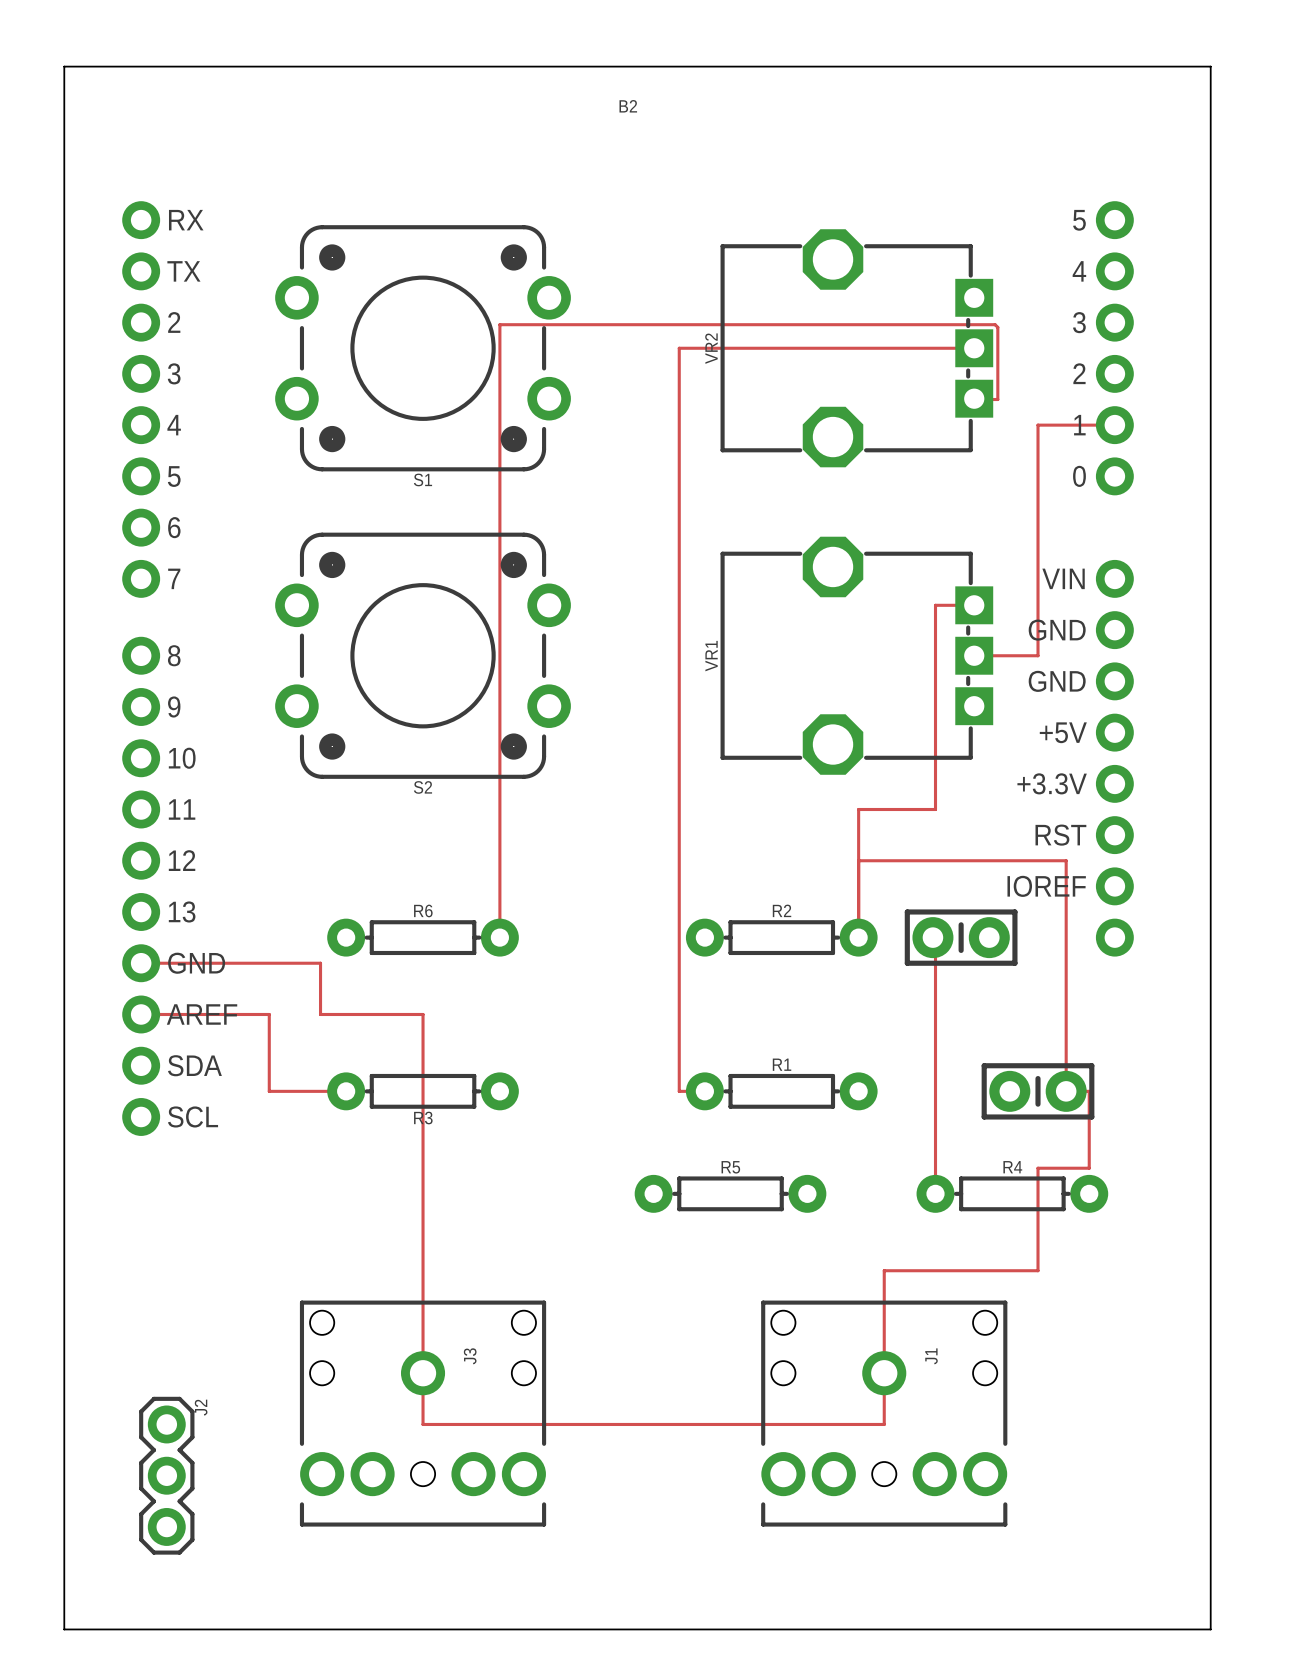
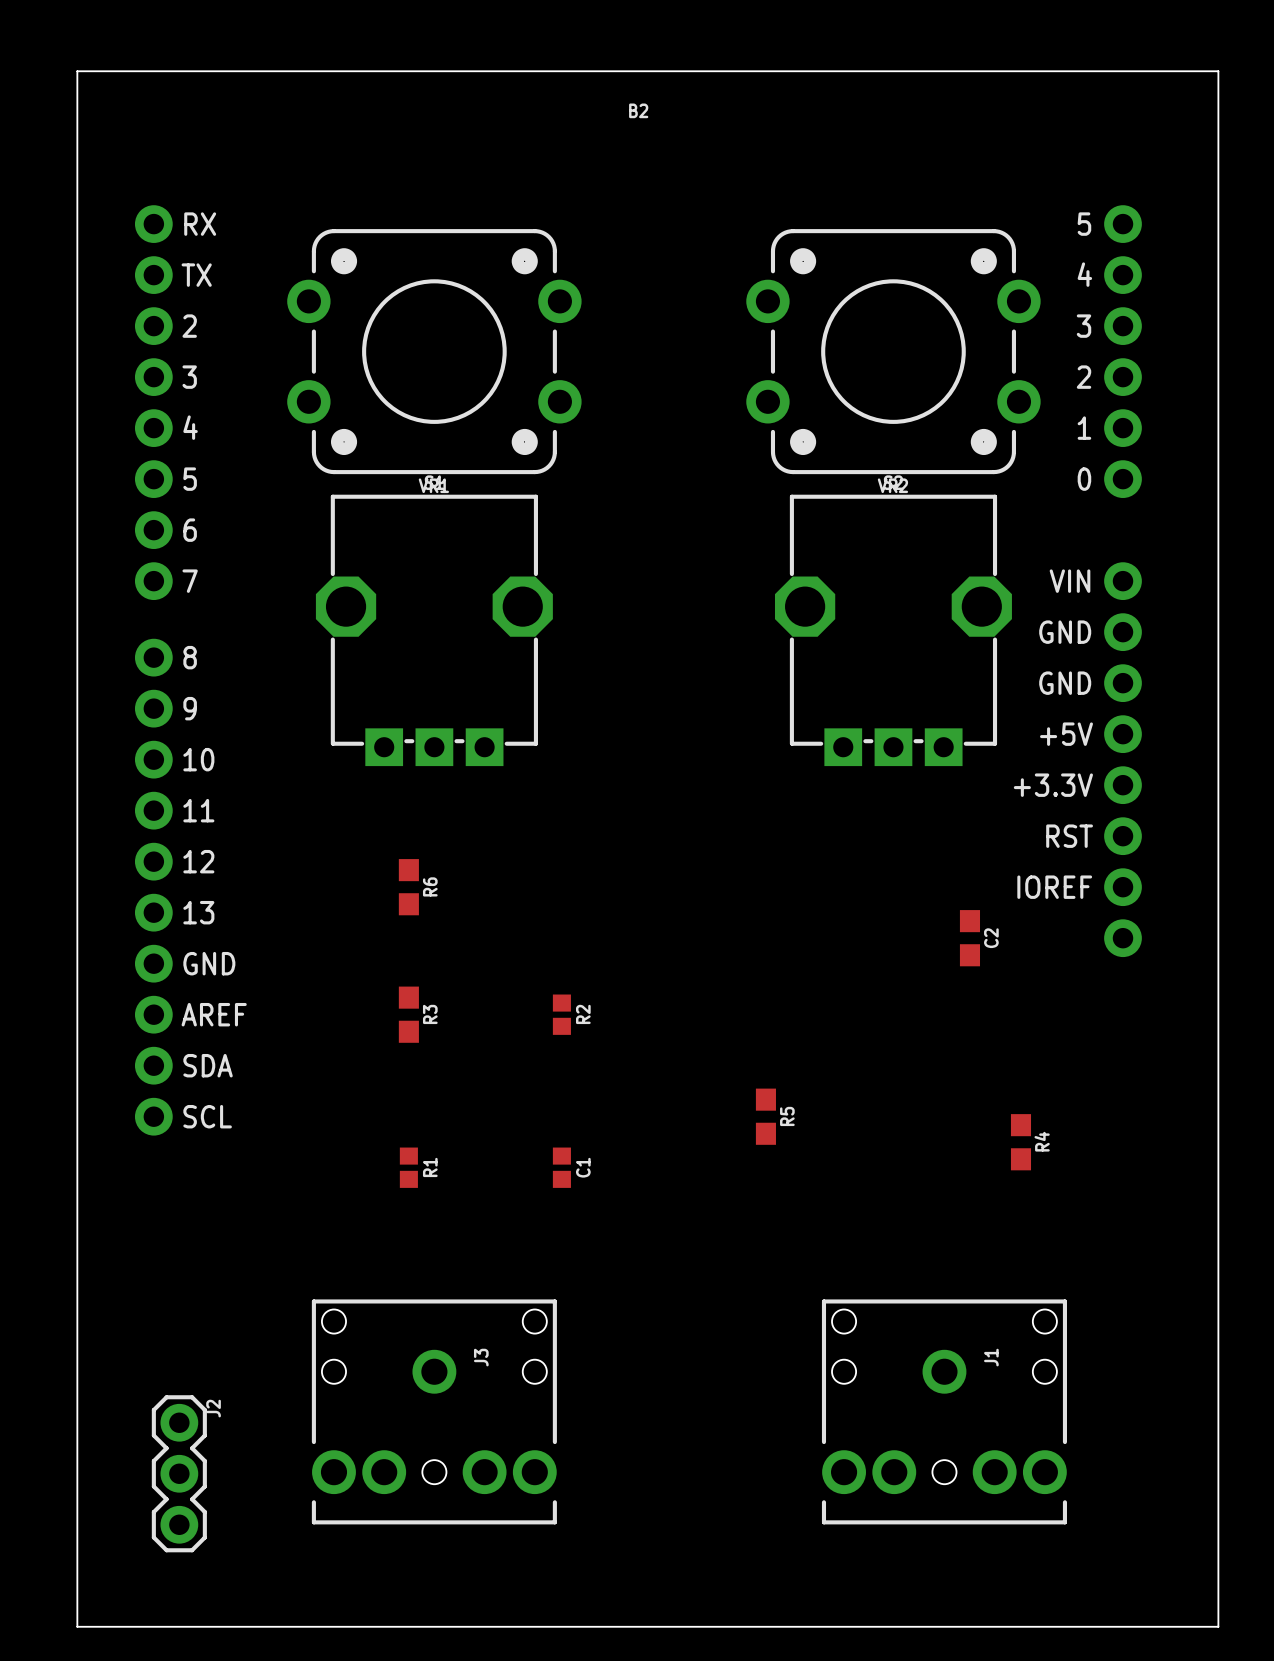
VR2 rotation: 0° (856, 348) -> 90° clockwise (893, 630)
VR2 position: (856, 348) -> (893, 630)
track: (974, 348) (679, 348) (679, 1091) (704, 1091) -> none
track: (974, 398) (997, 399) (997, 327) (995, 324) (499, 324) (499, 937) -> none
track: (1114, 425) (1038, 425) (1038, 655) (974, 655) -> none
track: (974, 605) (935, 605) (935, 809) (858, 809) (858, 937) -> none
S2 position: (423, 655) -> (893, 351)
VR1 rotation: 0° (856, 655) -> 90° clockwise (434, 630)
VR1 position: (856, 655) -> (434, 630)
track: (858, 860) (1066, 860) (1066, 1091) (1089, 1091) (1089, 1168) (1038, 1168) (1038, 1270) (884, 1270) (884, 1424) (423, 1424) (423, 1014) (320, 1014) (320, 963) (141, 963) -> none
R6 footprint: [327, 918, 519, 957] -> [398, 859, 419, 916]
R2 footprint: [685, 918, 878, 957] -> [552, 994, 571, 1035]
track: (932, 937) (935, 937) (935, 1193) -> none
part: (961, 937) -> none
C2: none -> (969, 938)
track: (141, 1014) (269, 1014) (269, 1091) (346, 1091) -> none
R3 footprint: [327, 1072, 519, 1111] -> [398, 986, 419, 1043]
R1 footprint: [685, 1072, 878, 1111] -> [399, 1147, 418, 1188]
part: (1038, 1091) -> none
C1: none -> (561, 1167)
R5 footprint: [634, 1174, 827, 1213] -> [755, 1088, 776, 1145]
R4 footprint: [916, 1174, 1109, 1213] -> [1010, 1114, 1032, 1171]
J1 position: (884, 1413) -> (944, 1411)

